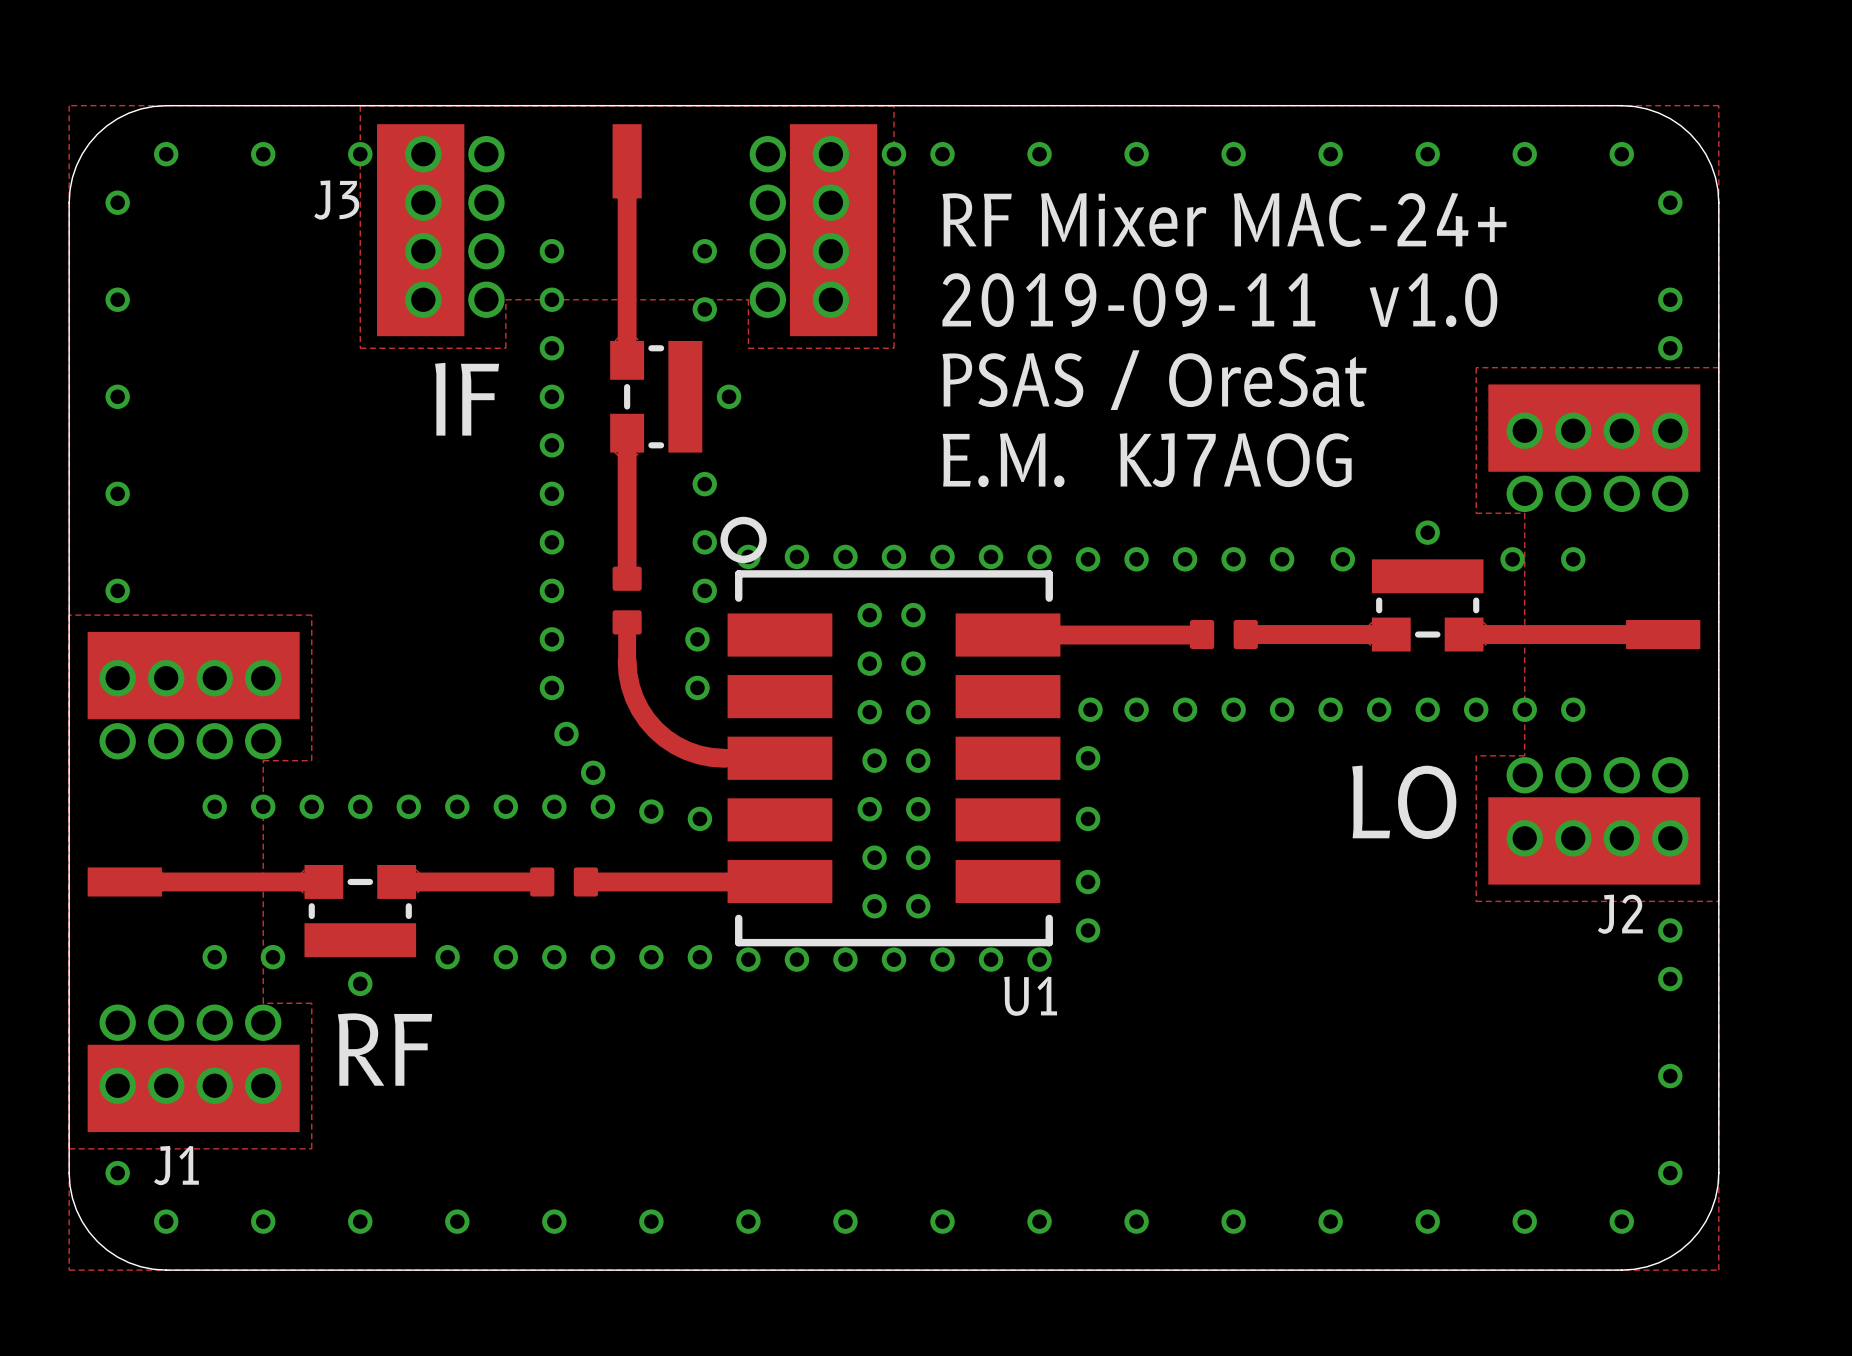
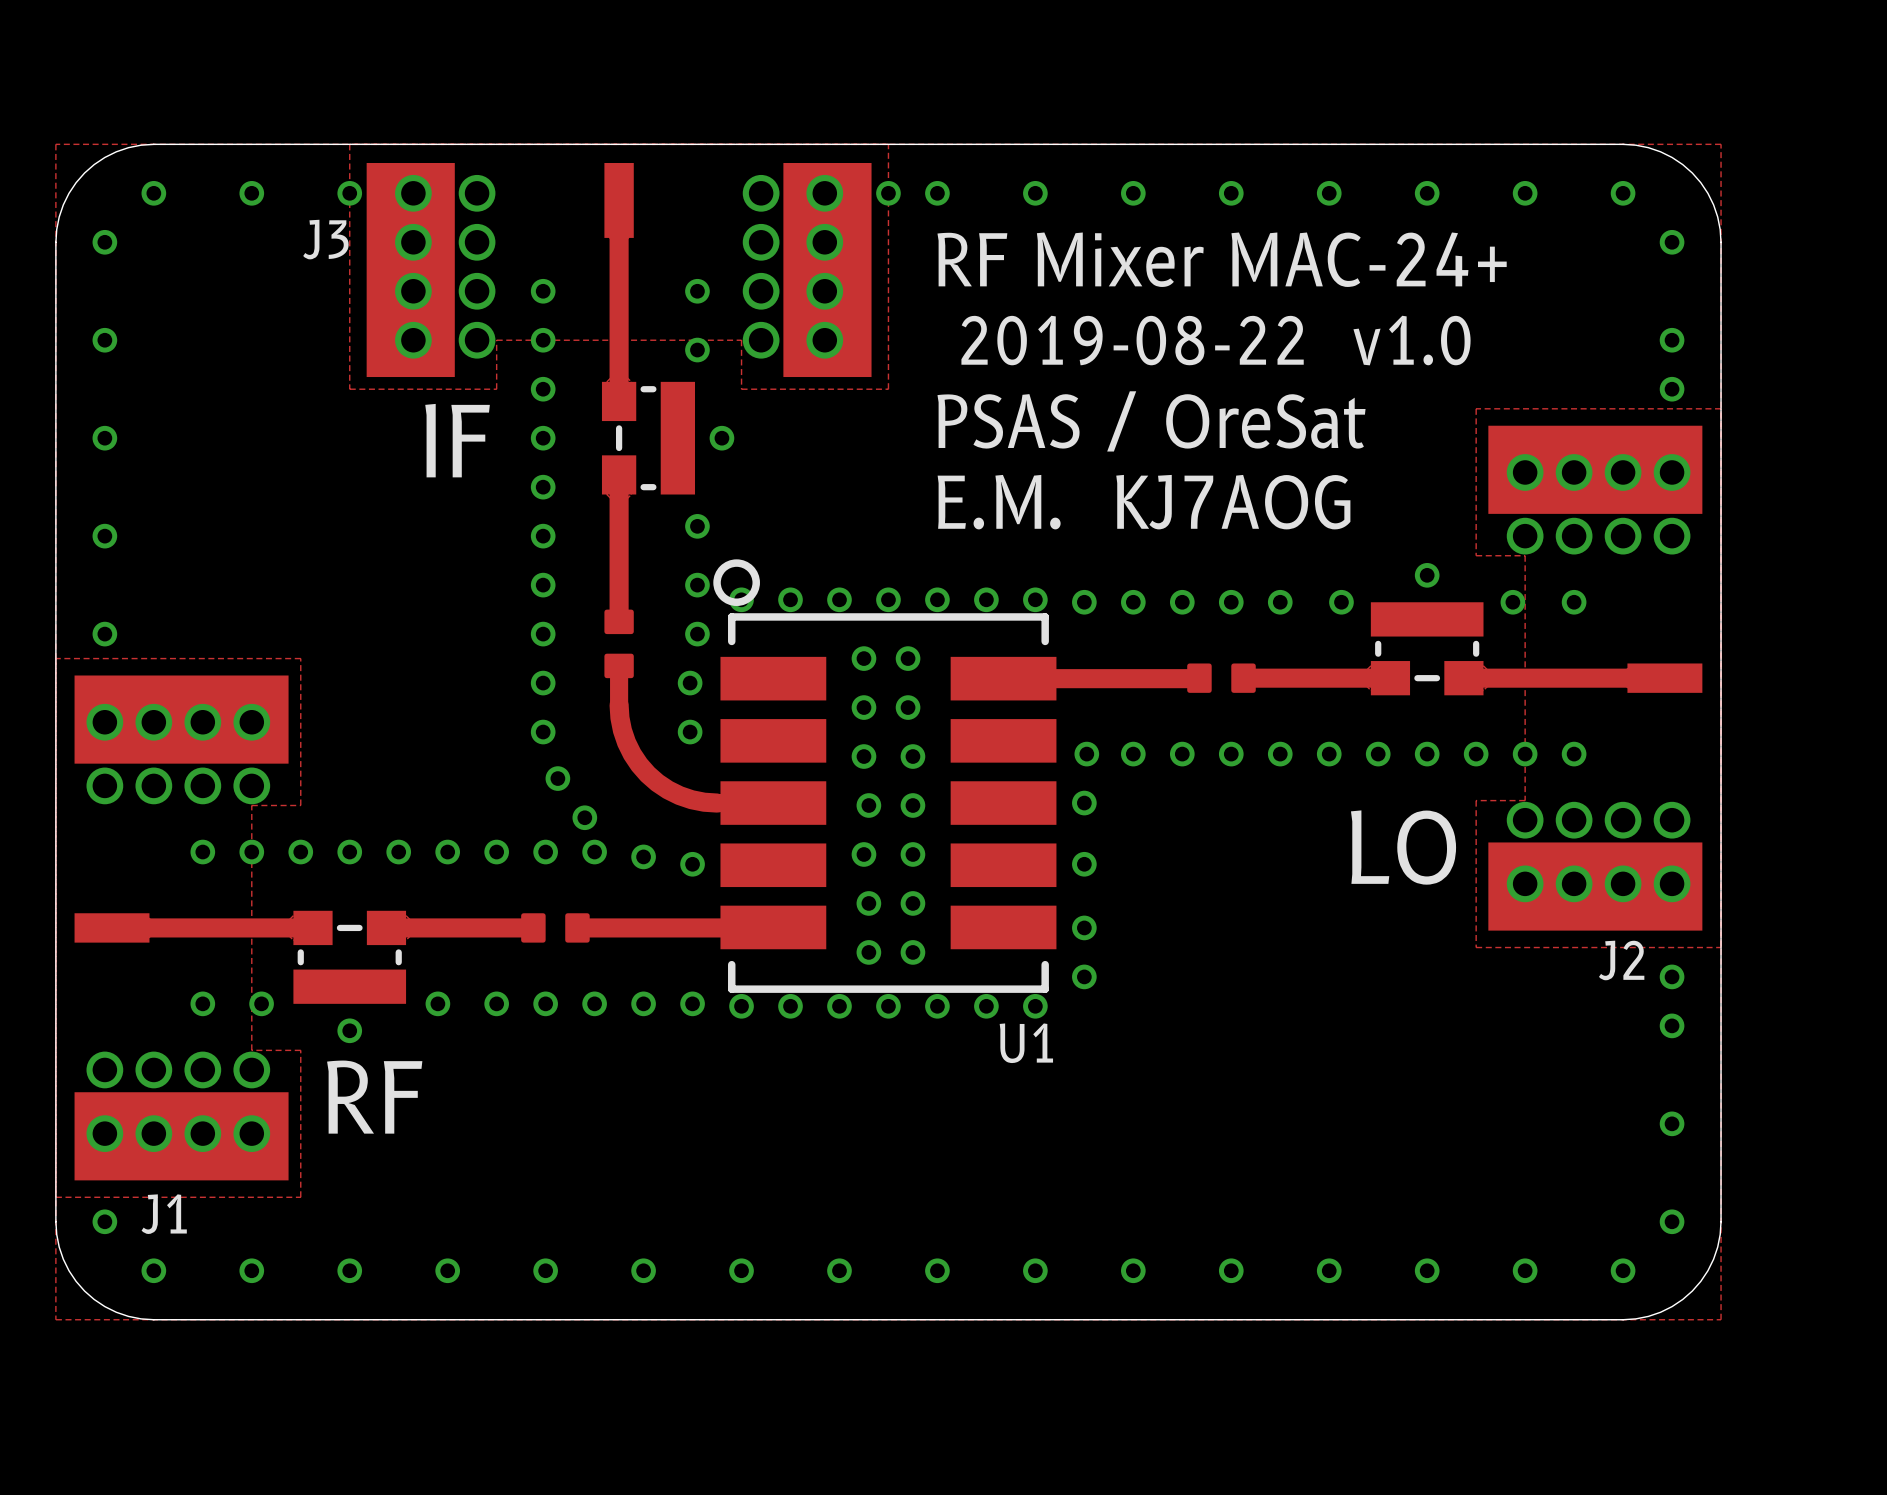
text: 2019-09-11 v1.0 (1219, 300) -> 2019-08-22 v1.0 (1216, 340)

